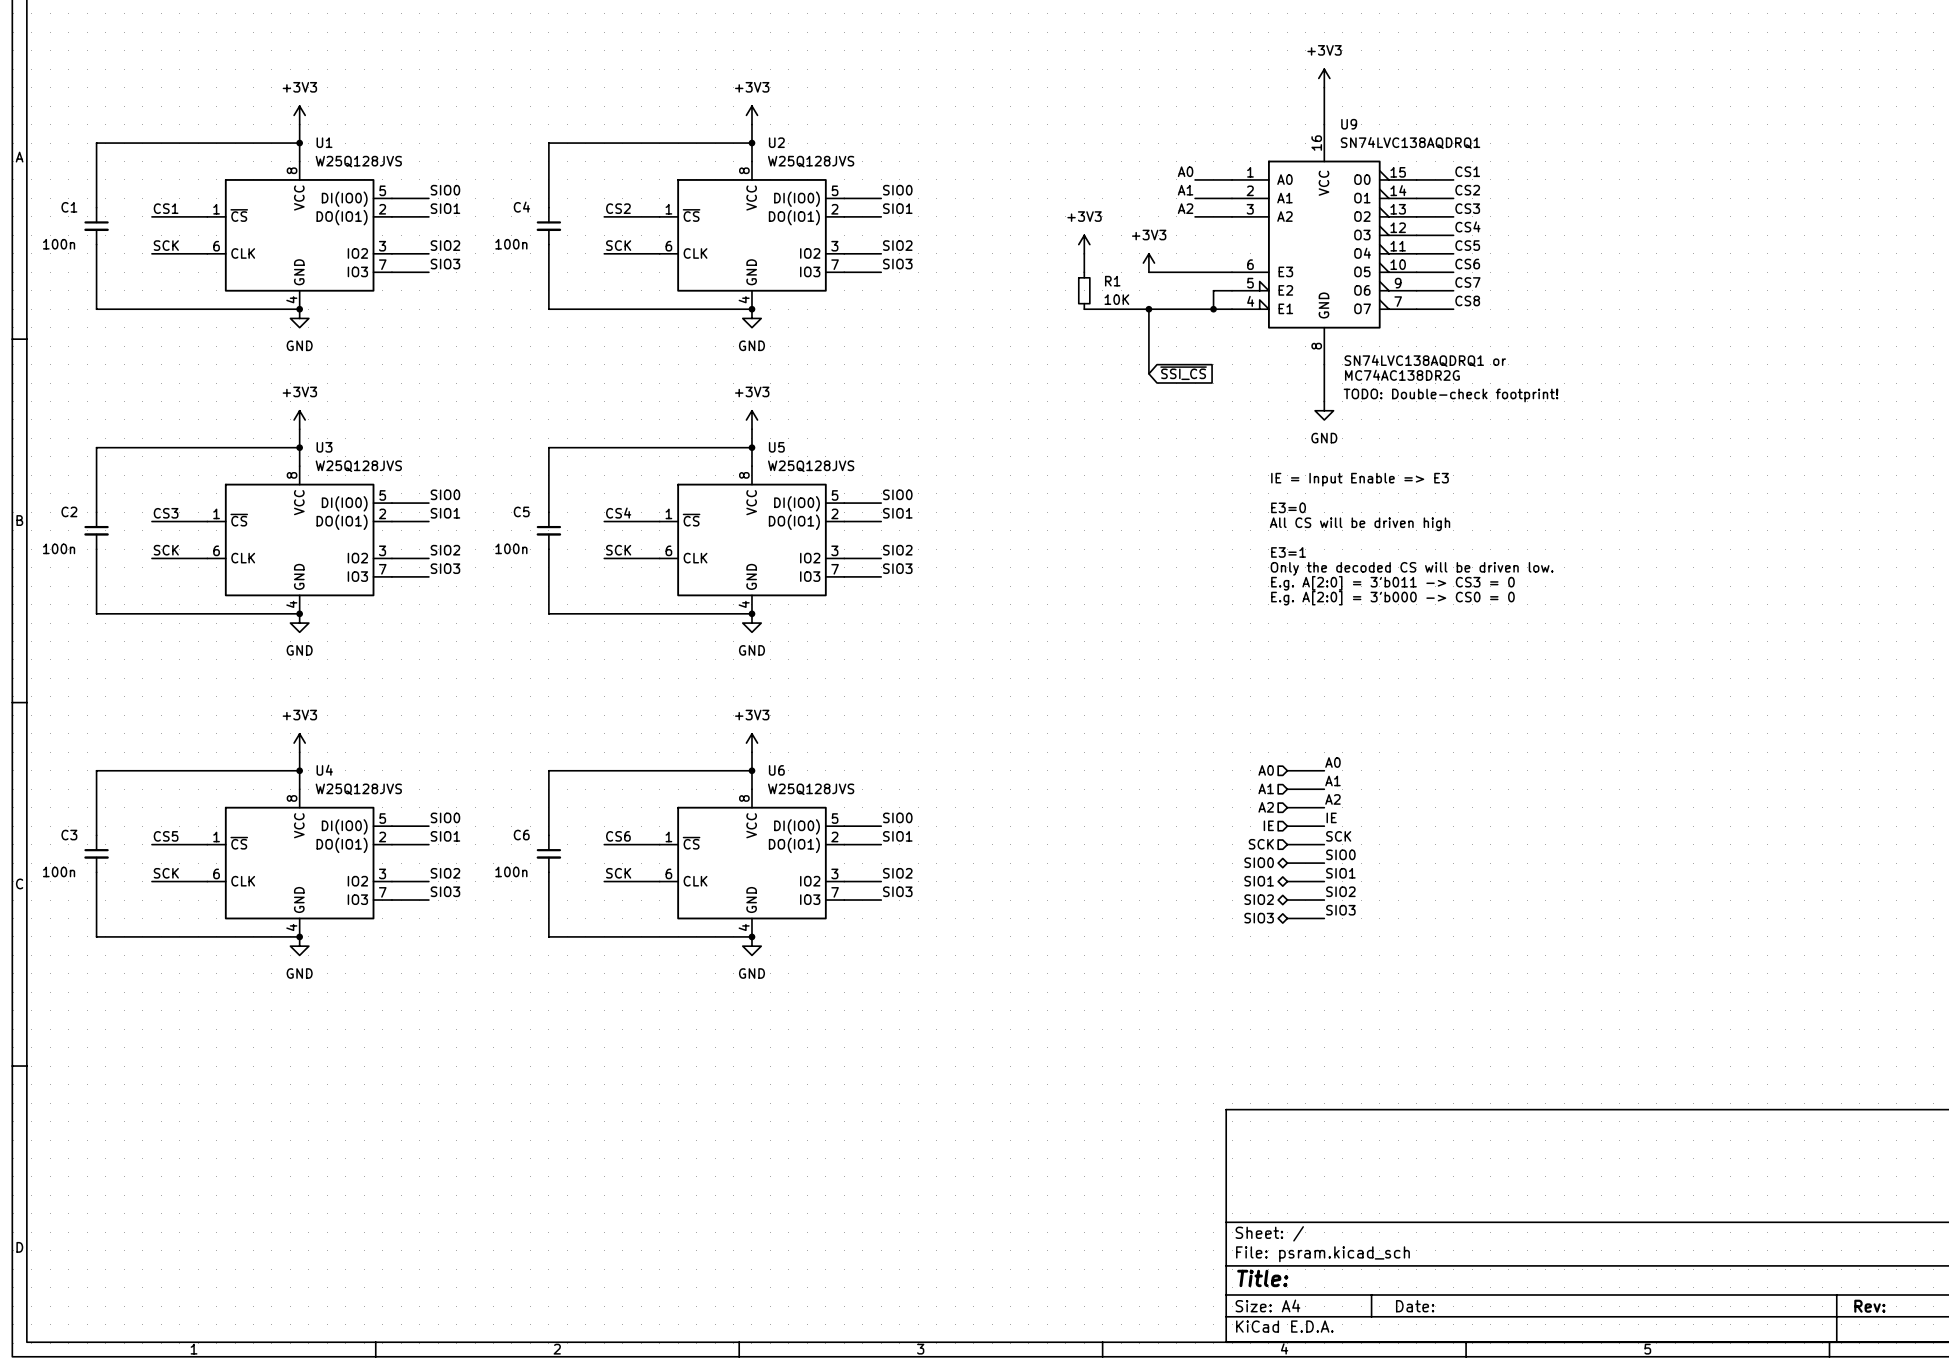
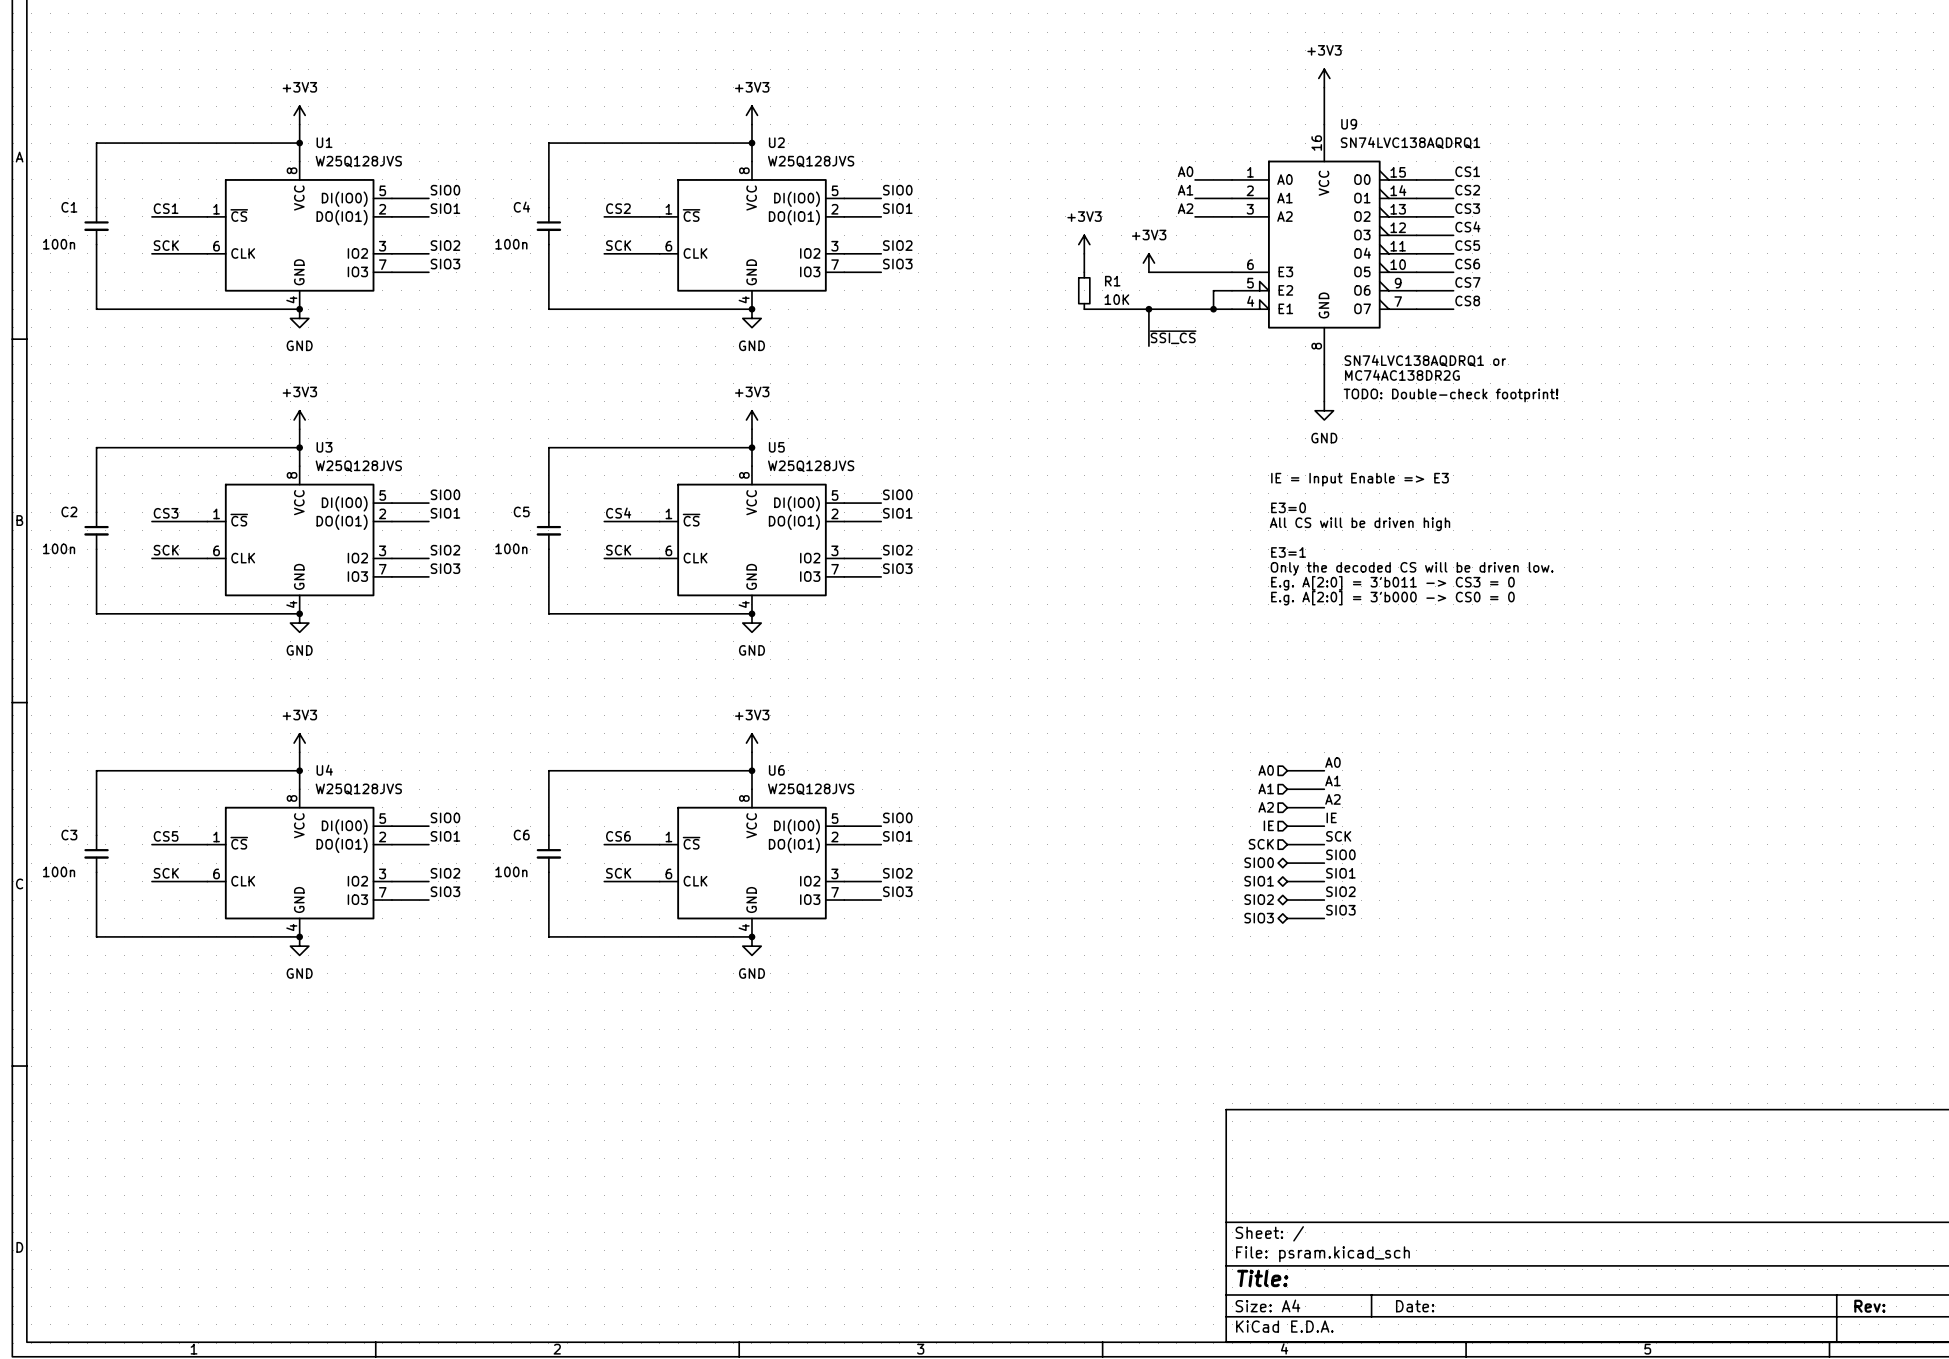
label: none -> ~{SSI_CS} (1173, 337)
wire: (1148, 346) (1148, 373) -> none
global label: ~{SSI_CS} (1183, 373) -> none

